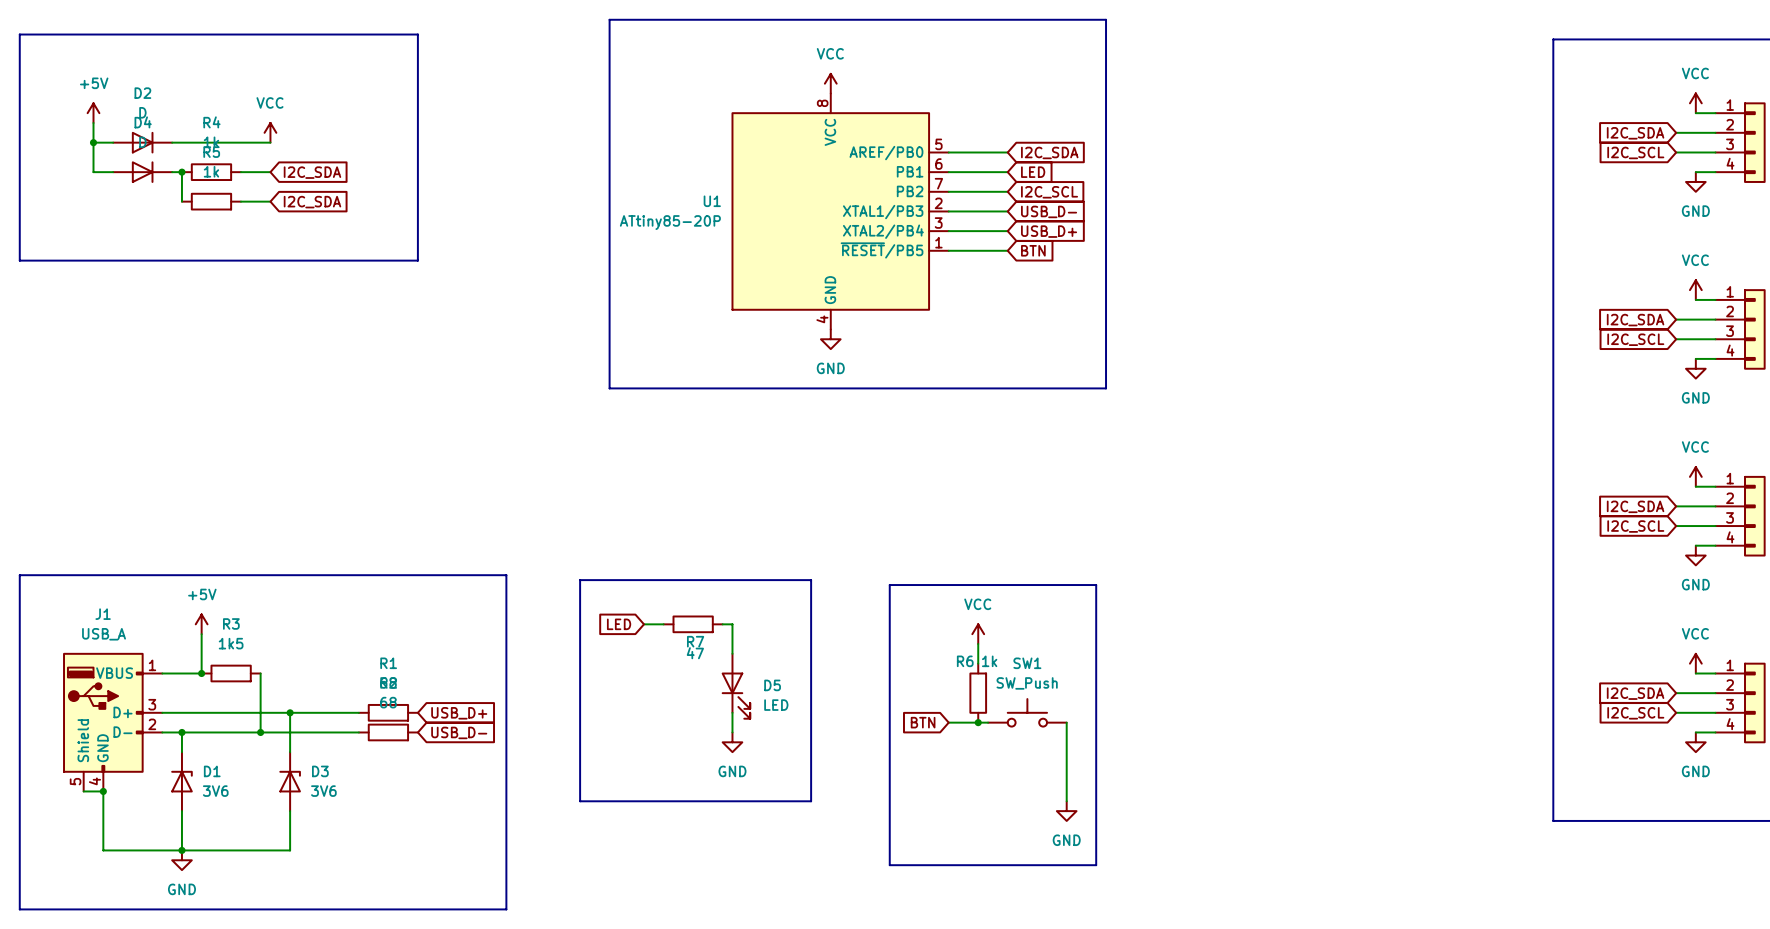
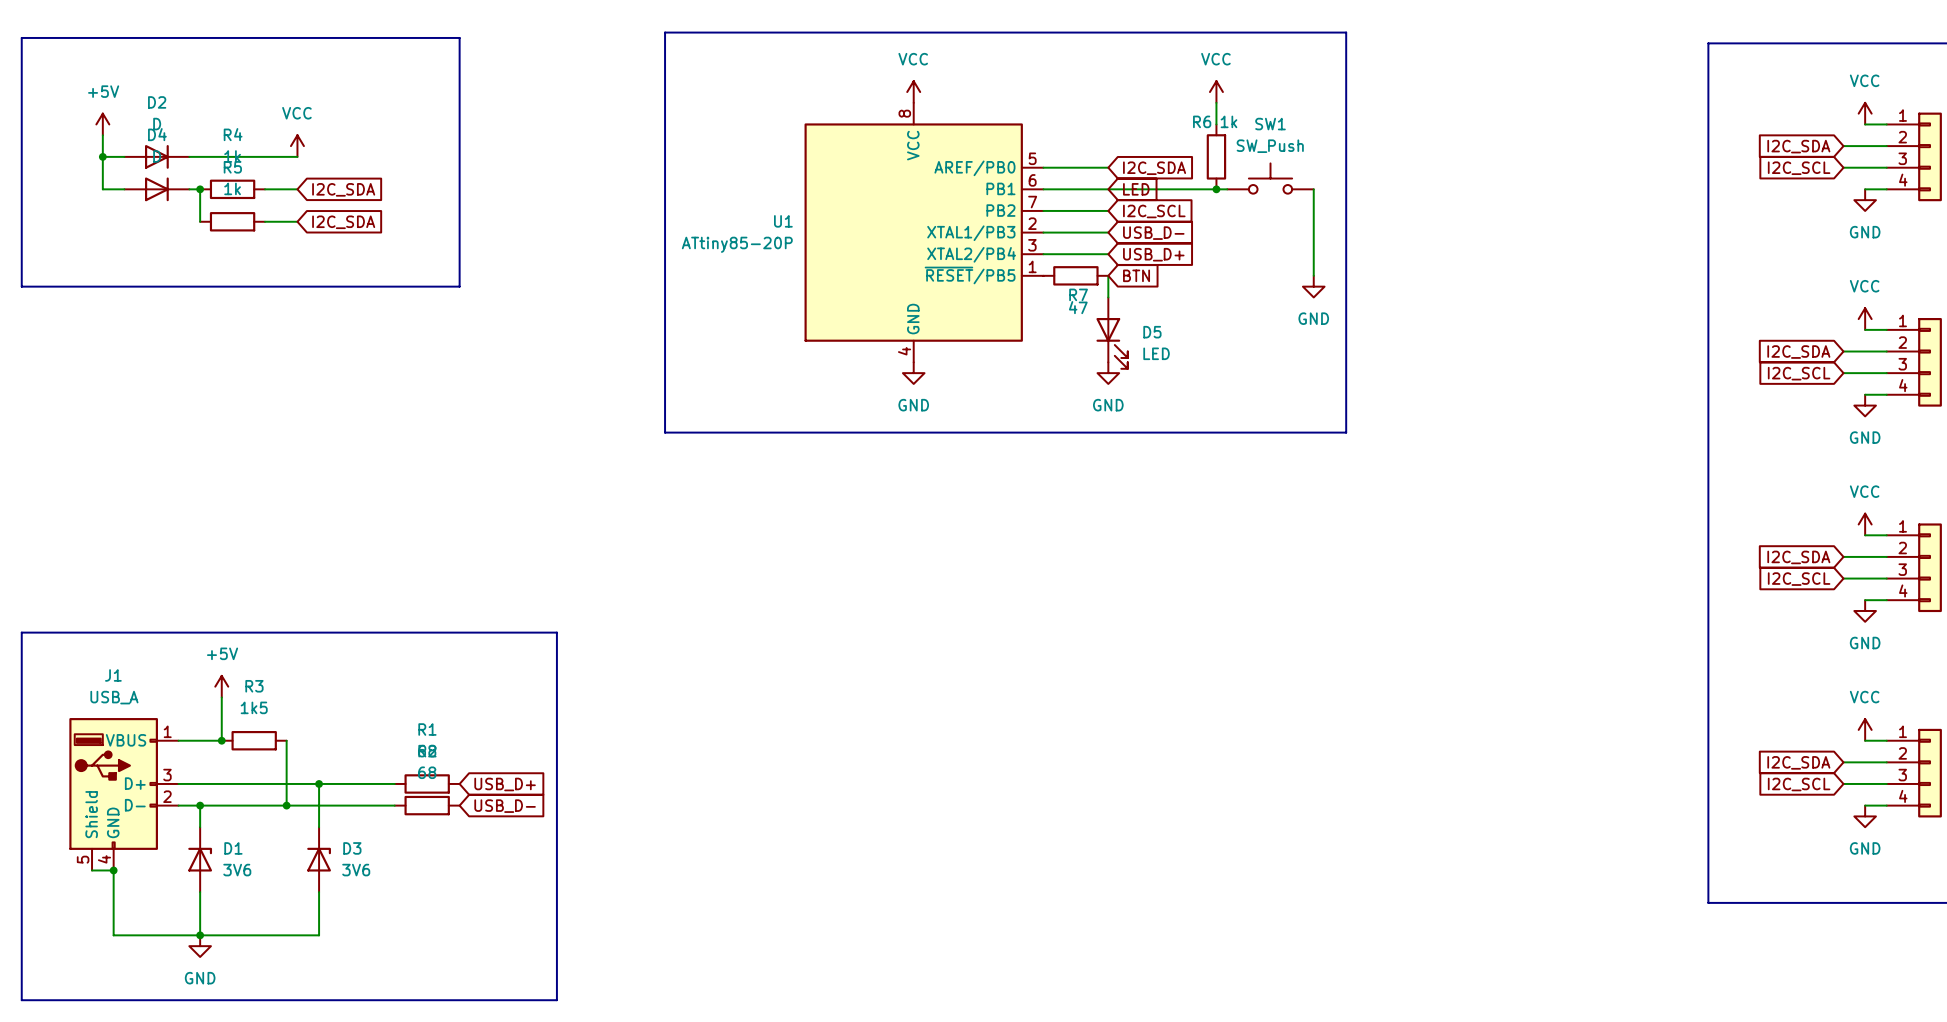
line: (609, 19) (1106, 19) (1106, 388) (609, 388) (609, 19) -> (665, 32) (665, 432) (1346, 432) (1346, 32) (665, 32)
power symbol: none -> VCC (1216, 92)
wire: none -> (1108, 189) (1227, 189)
junction: none -> (1216, 189)
wire: none -> (1313, 189) (1313, 275)
wire: (948, 250) (1007, 250) -> (1108, 297) (1108, 275)
power symbol: none -> GND (1313, 286)
power symbol: none -> GND (1108, 373)
line: (580, 580) (811, 580) (811, 801) (580, 801) (580, 580) -> none
line: (889, 585) (1096, 585) (1096, 865) (889, 865) (889, 585) -> none
global label: LED (619, 624) -> none
wire: (644, 624) (663, 624) -> none
R7 position: (693, 624) -> (1075, 275)
wire: (722, 624) (732, 624) (732, 653) -> none
power symbol: VCC (978, 634) -> none
wire: (978, 644) (978, 663) -> none
D5 position: (735, 686) -> (1112, 333)
R6 position: (978, 693) -> (1216, 156)
wire: (732, 712) (732, 732) -> none
SW1 position: (1027, 712) -> (1270, 178)
global label: BTN (923, 722) -> none
wire: (948, 722) (988, 722) -> none
junction: (978, 722) -> none
wire: (1066, 722) (1066, 801) -> none
power symbol: GND (732, 742) -> none
power symbol: GND (1066, 811) -> none

